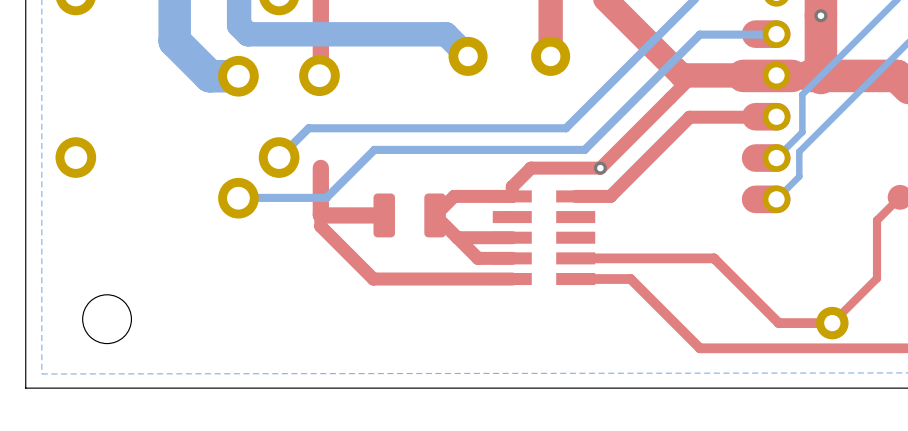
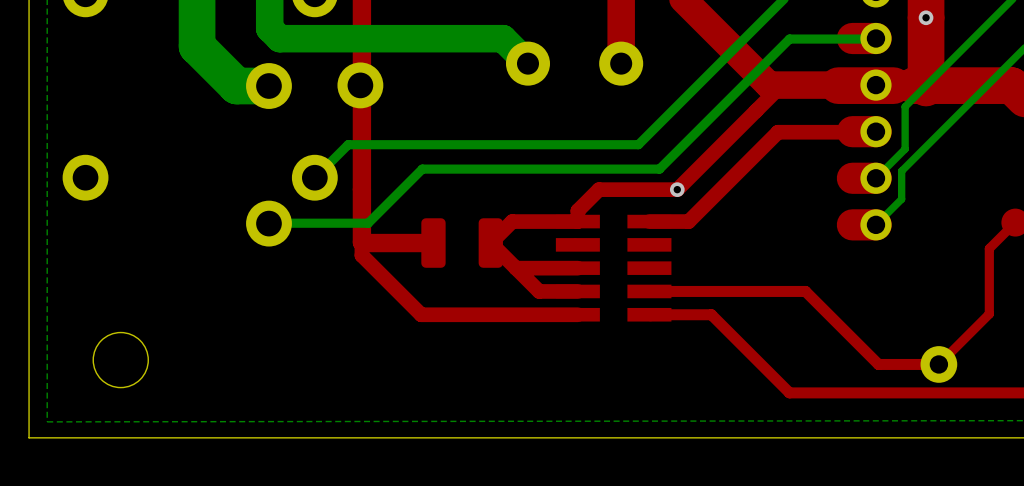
top track: none -> (361, 85) (361, 189)

